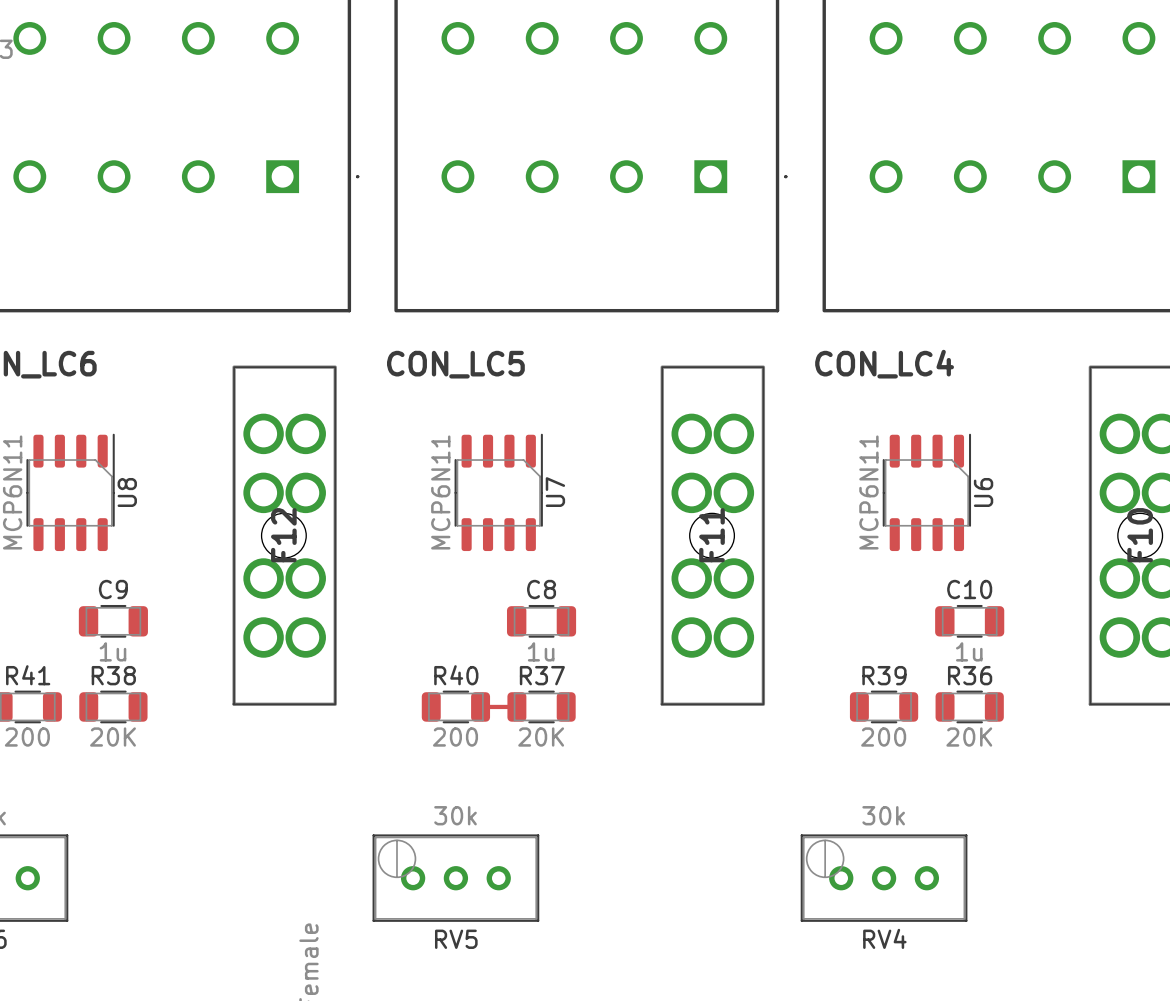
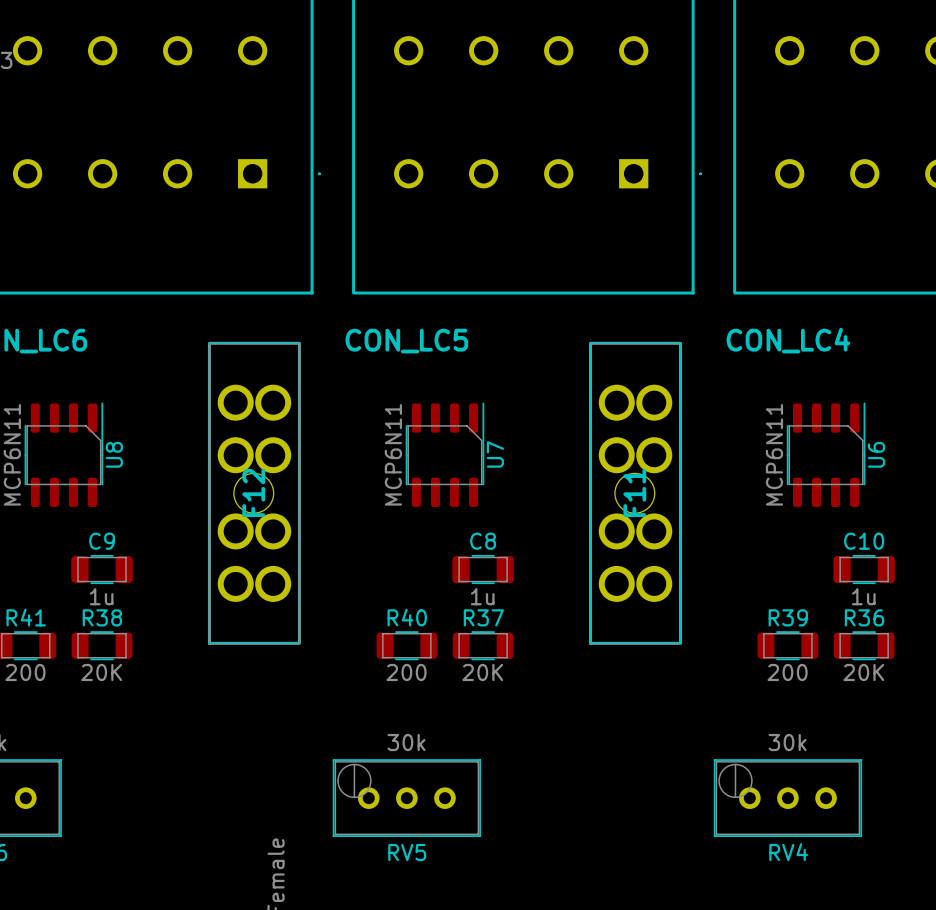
track: (480, 706) (516, 706) -> none

